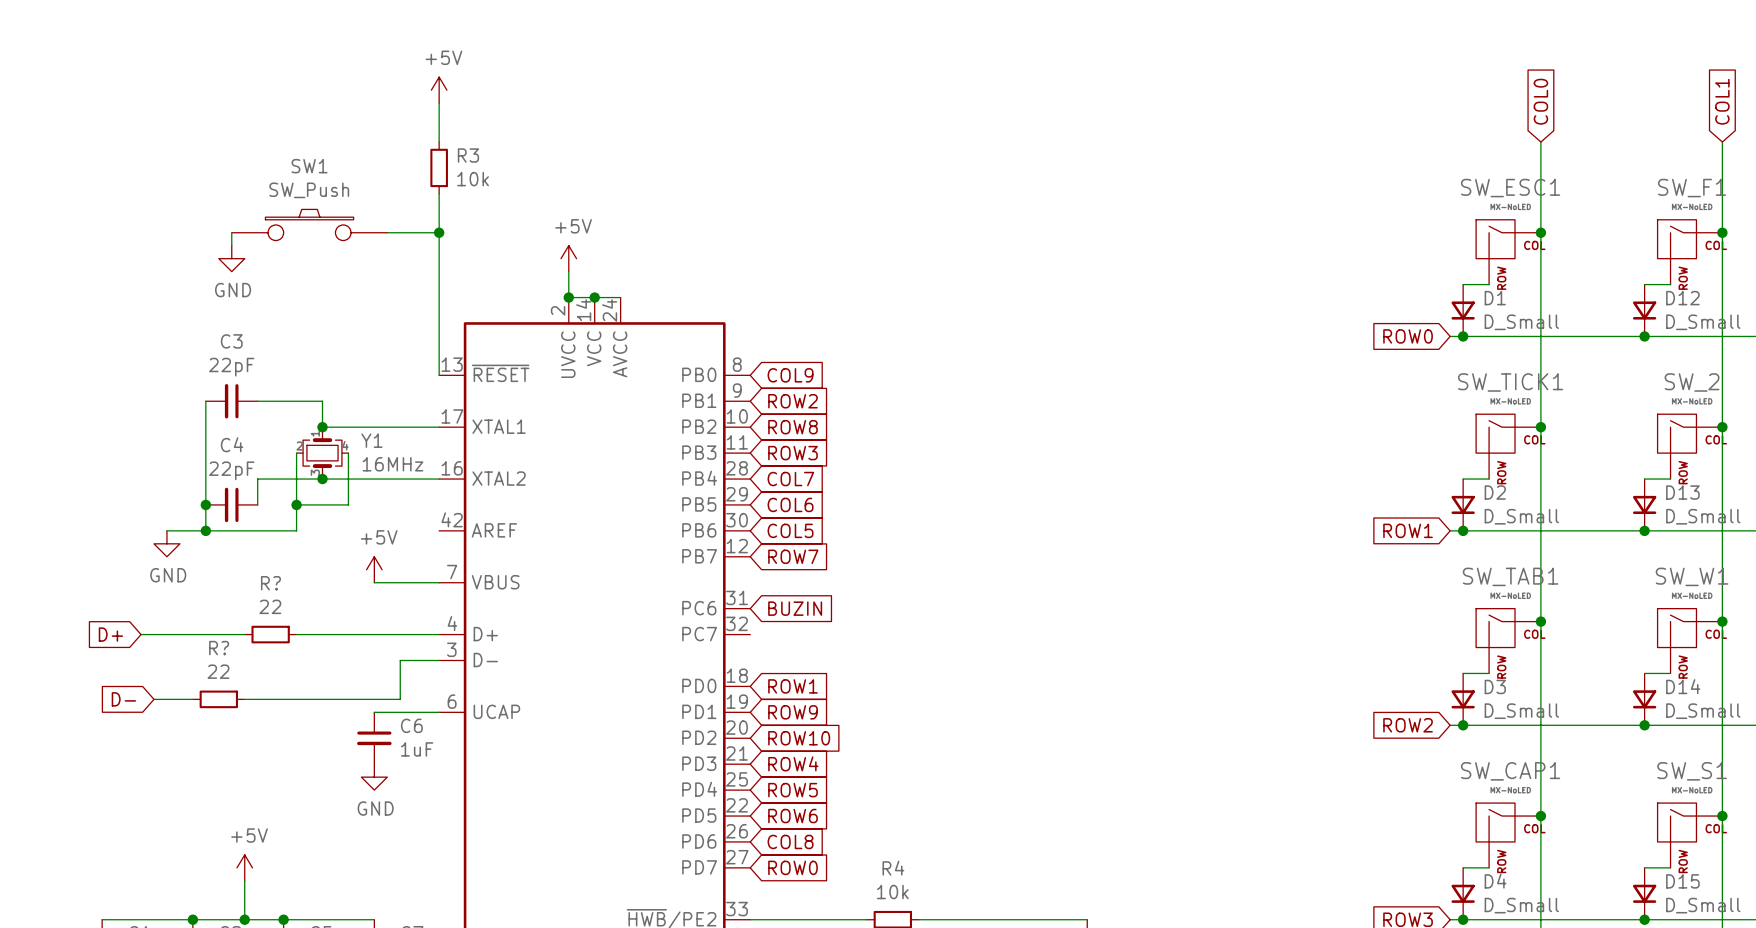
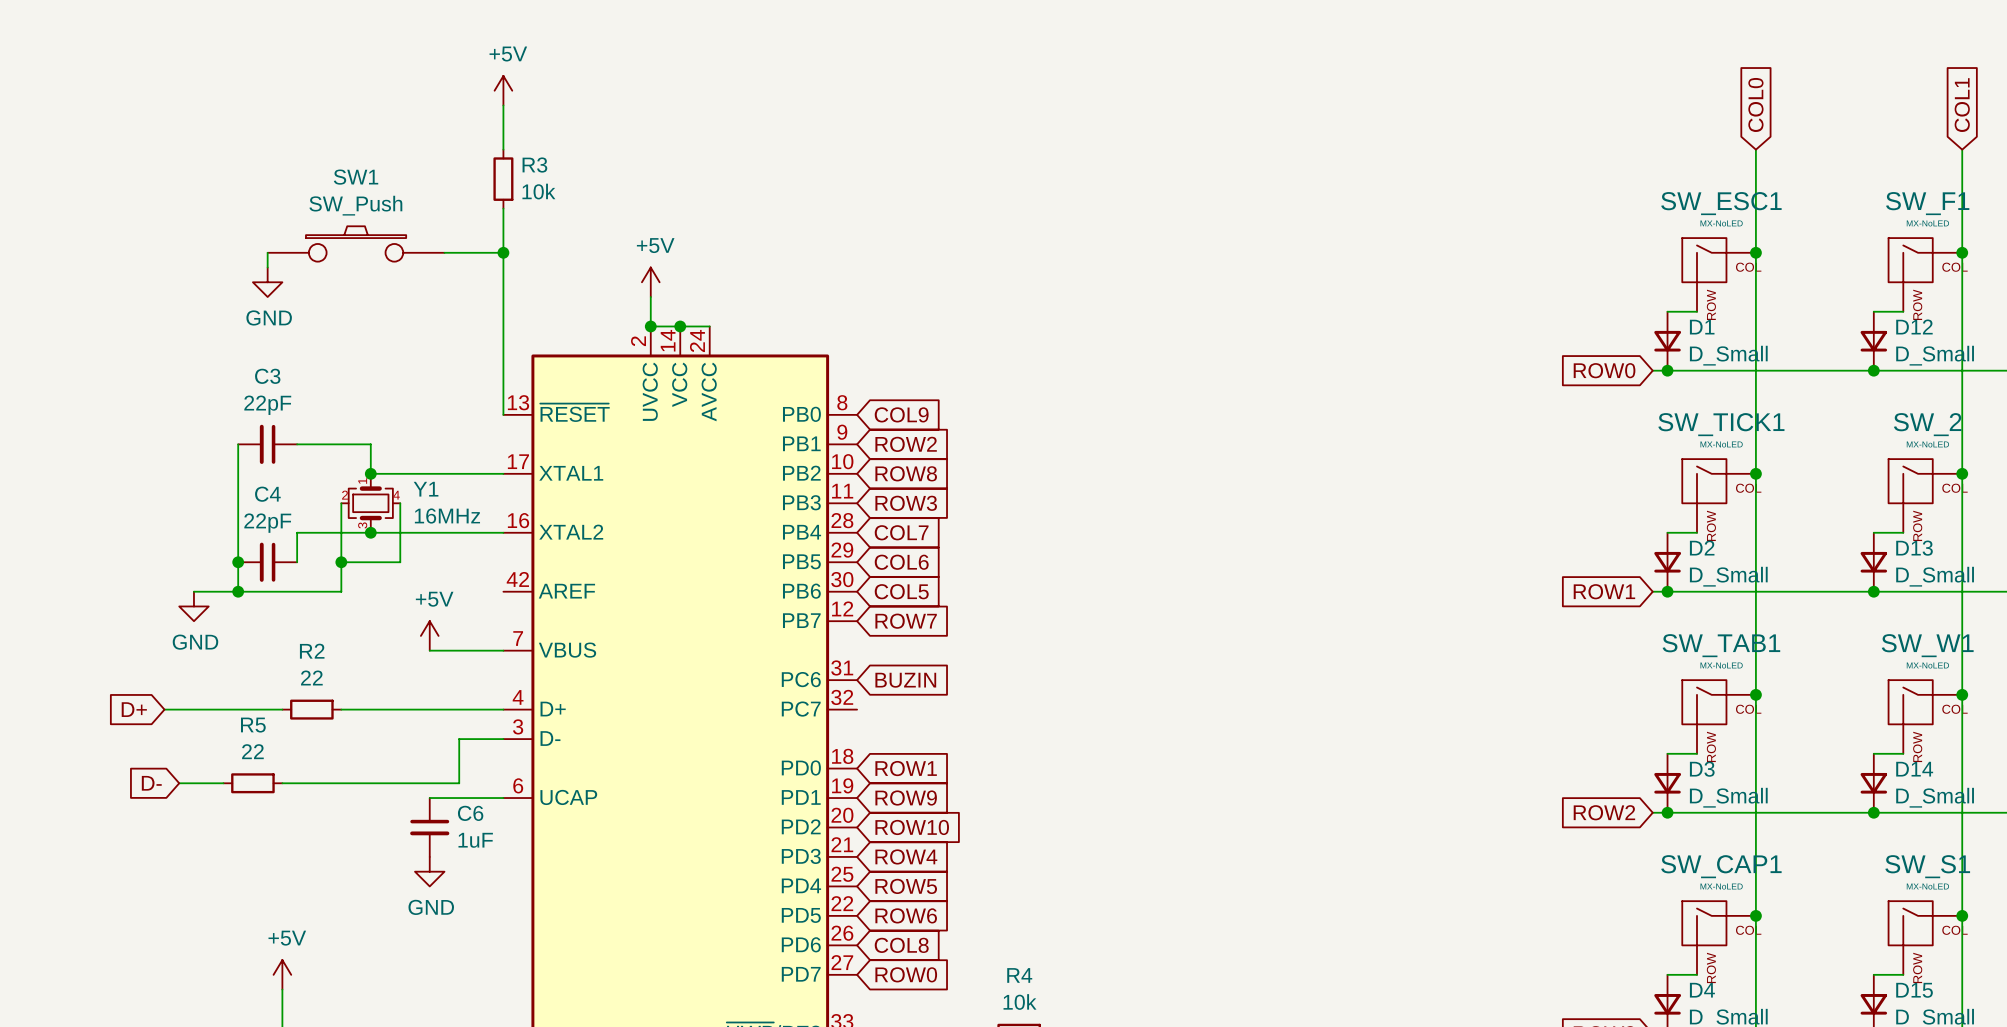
R? name: R? (270, 583) -> R2 (312, 651)
R? name: R? (219, 648) -> R5 (253, 725)

